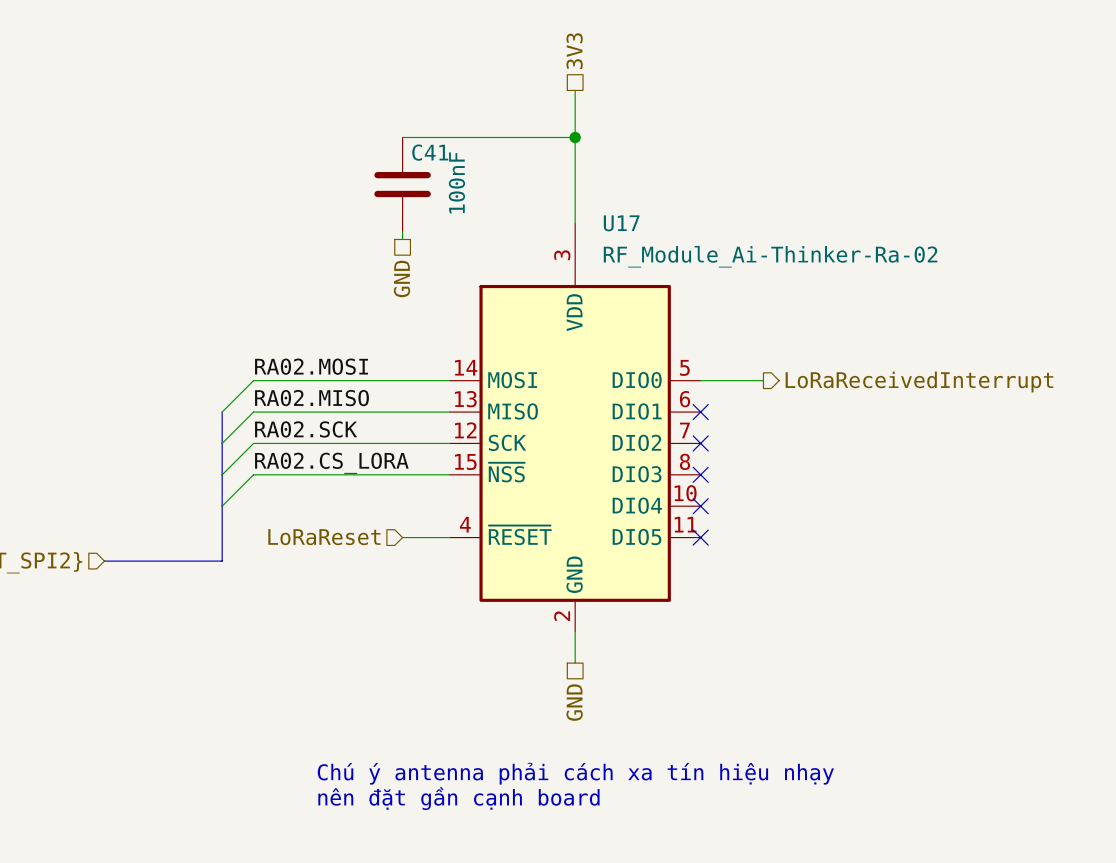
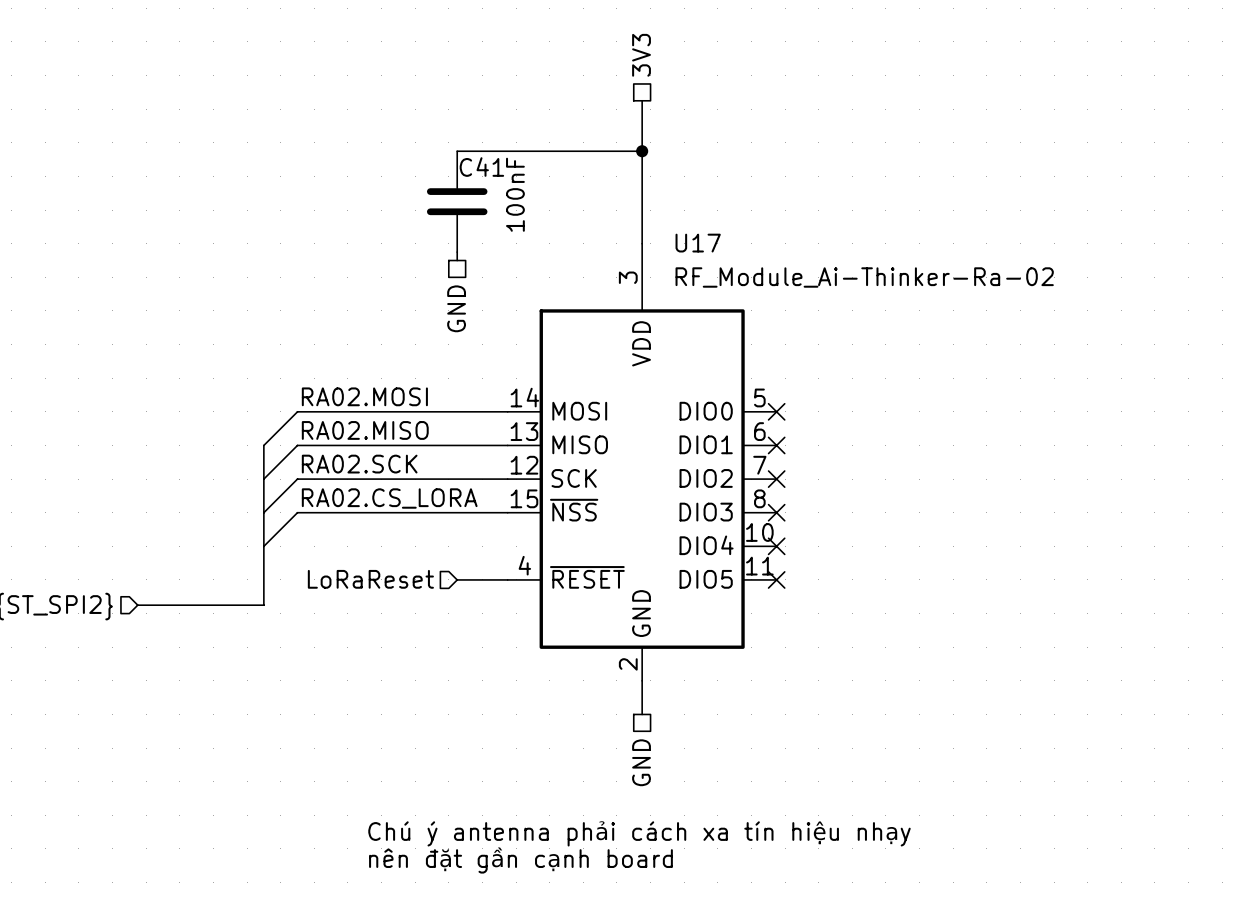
wire: (700, 380) (763, 380) -> none
no-connect mark: none -> (776, 411)
hierarchical label: LoRaReceivedInterrupt (919, 382) -> none

